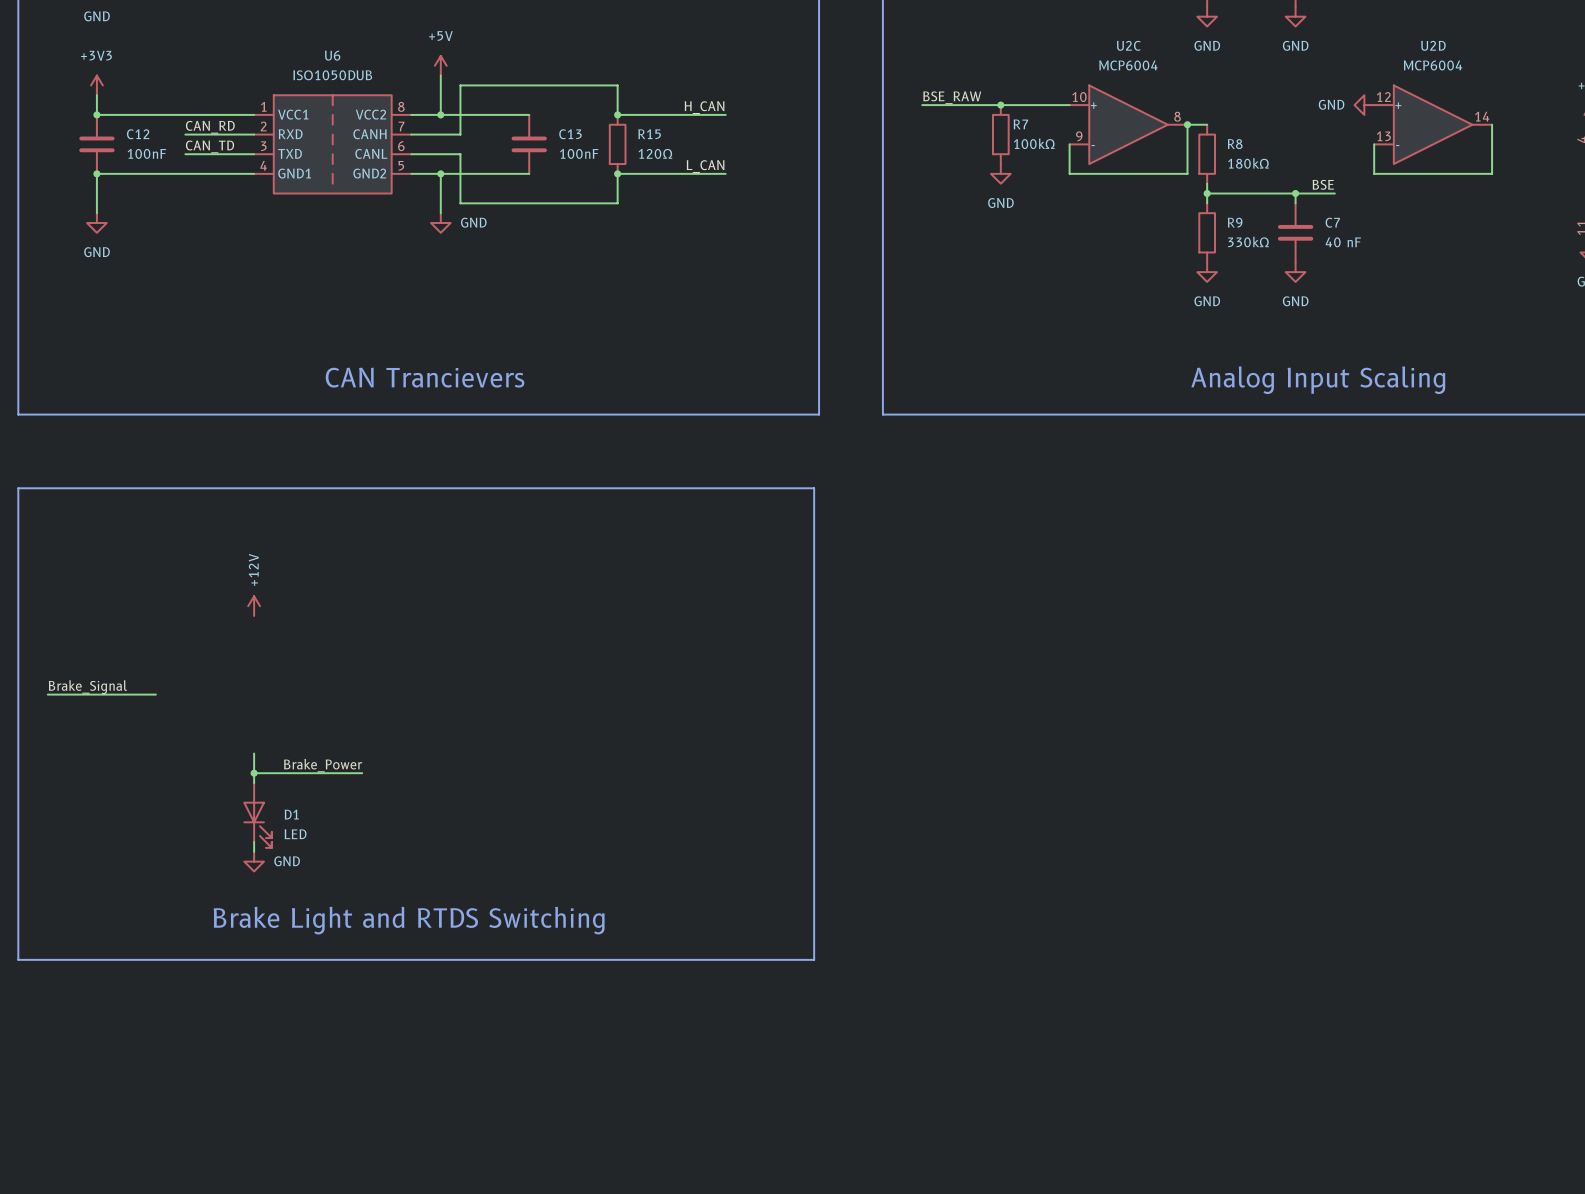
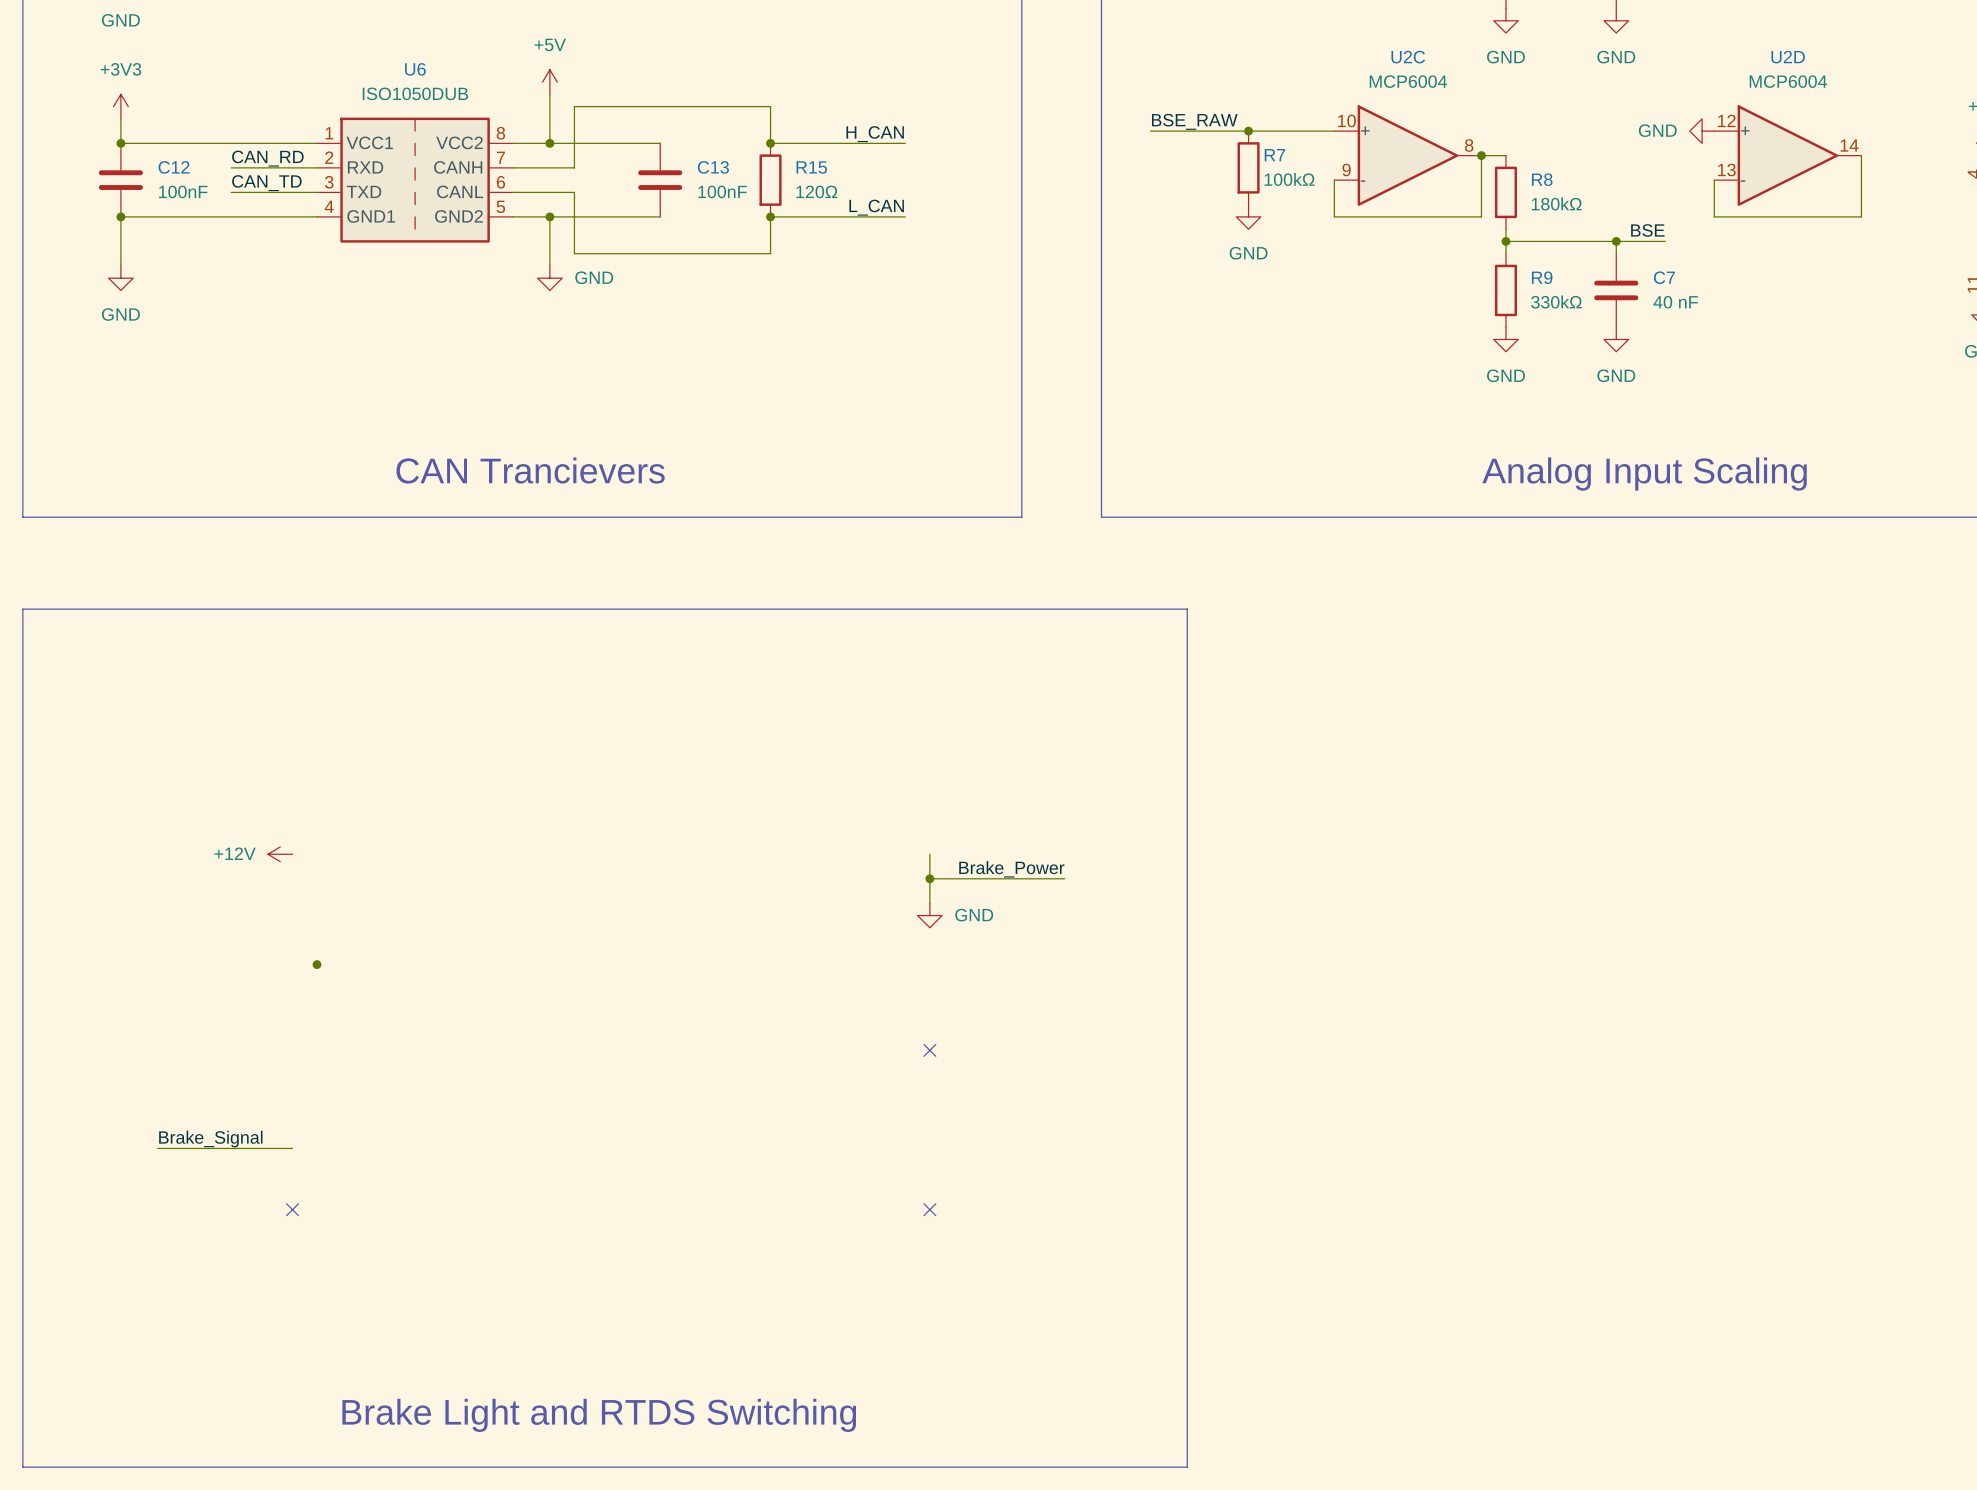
line: (814, 488) (814, 959) (18, 959) -> (1015, 609) (1187, 609) (1187, 1467) (22, 1467) (22, 1197)
power symbol rotation: 0° (254, 606) -> 90° counterclockwise (280, 854)
power symbol position: +12V (254, 606) -> +12V (280, 854)
wire: none -> (929, 854) (929, 903)
label: Brake_Signal (87, 687) -> none
wire: (47, 694) (155, 694) -> none
label: none -> Brake_Power (1011, 869)
wire: none -> (929, 878) (1064, 878)
junction: none -> (929, 878)
power symbol: none -> GND (929, 915)
wire: (254, 753) (254, 783) -> none
label: Brake_Power (323, 765) -> none
wire: (254, 773) (362, 773) -> none
D1: LED (257, 815) -> none
wire: (254, 841) (254, 851) -> none
no-connect mark: none -> (929, 1050)
power symbol: GND (254, 861) -> none
label: none -> Brake_Signal (210, 1139)
wire: none -> (157, 1148) (292, 1148)
text: Brake Light and RTDS Switching (409, 920) -> none
no-connect mark: none -> (292, 1209)
no-connect mark: none -> (929, 1209)
text: none -> Brake Light and RTDS Switching (599, 1415)

